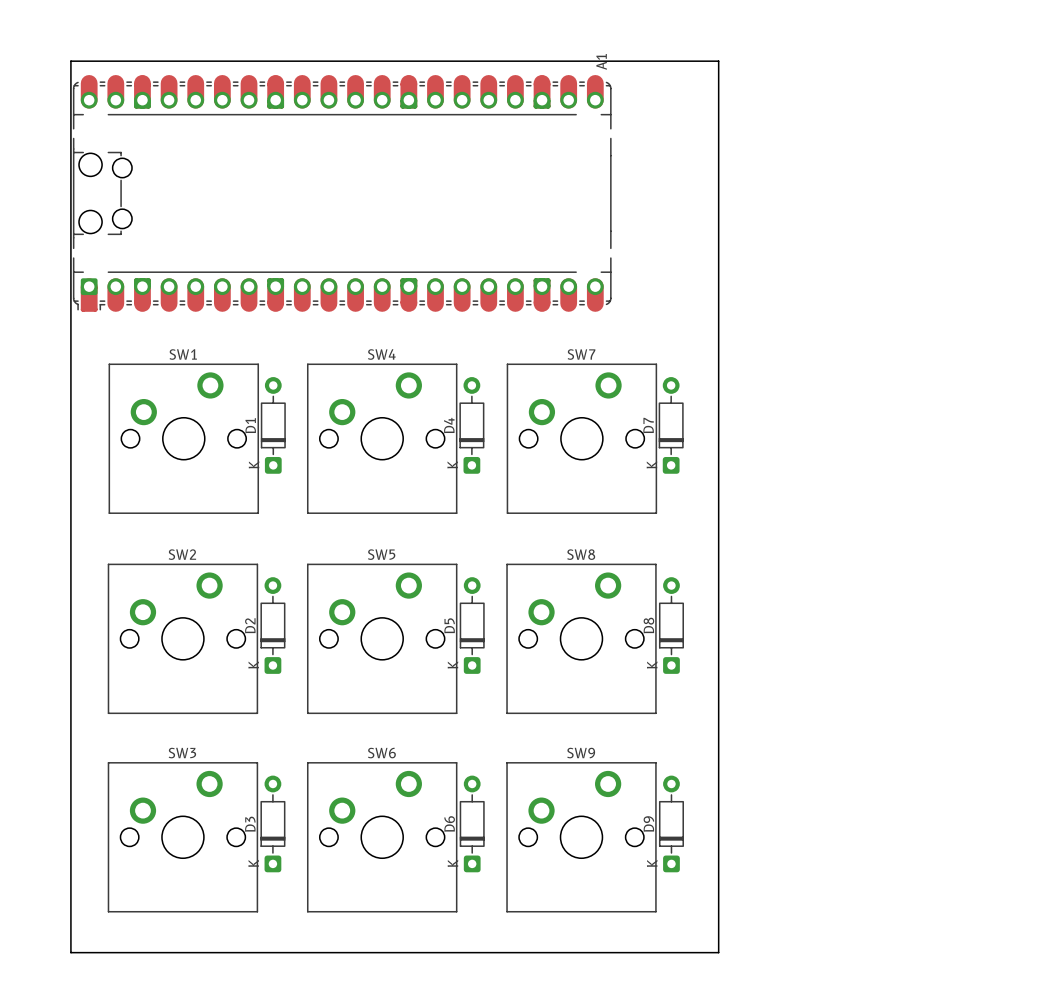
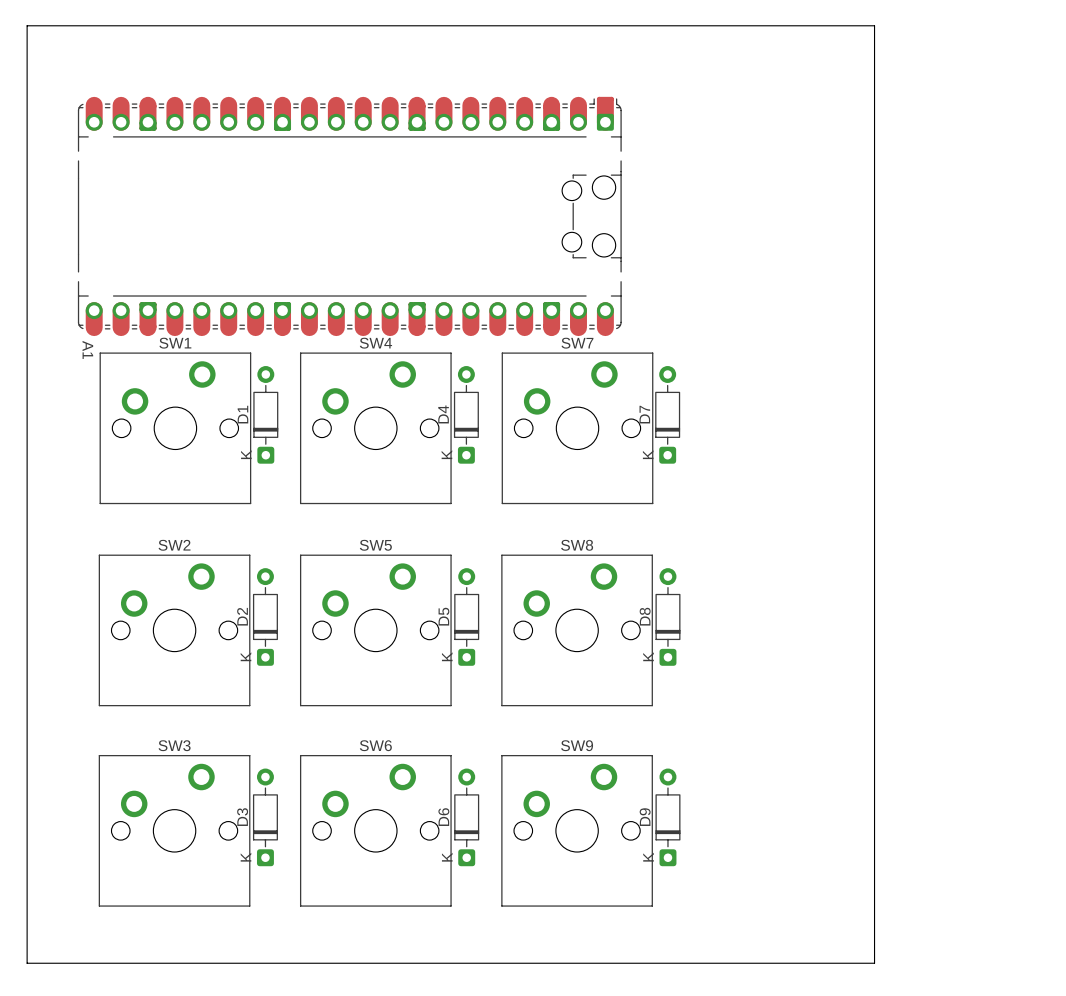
board edge: (70, 61) (718, 61) (718, 952) (70, 952) (70, 61) -> (27, 25) (27, 963) (874, 963) (874, 25) (27, 25)
A1 rotation: 0° (342, 193) -> 180° (349, 216)

